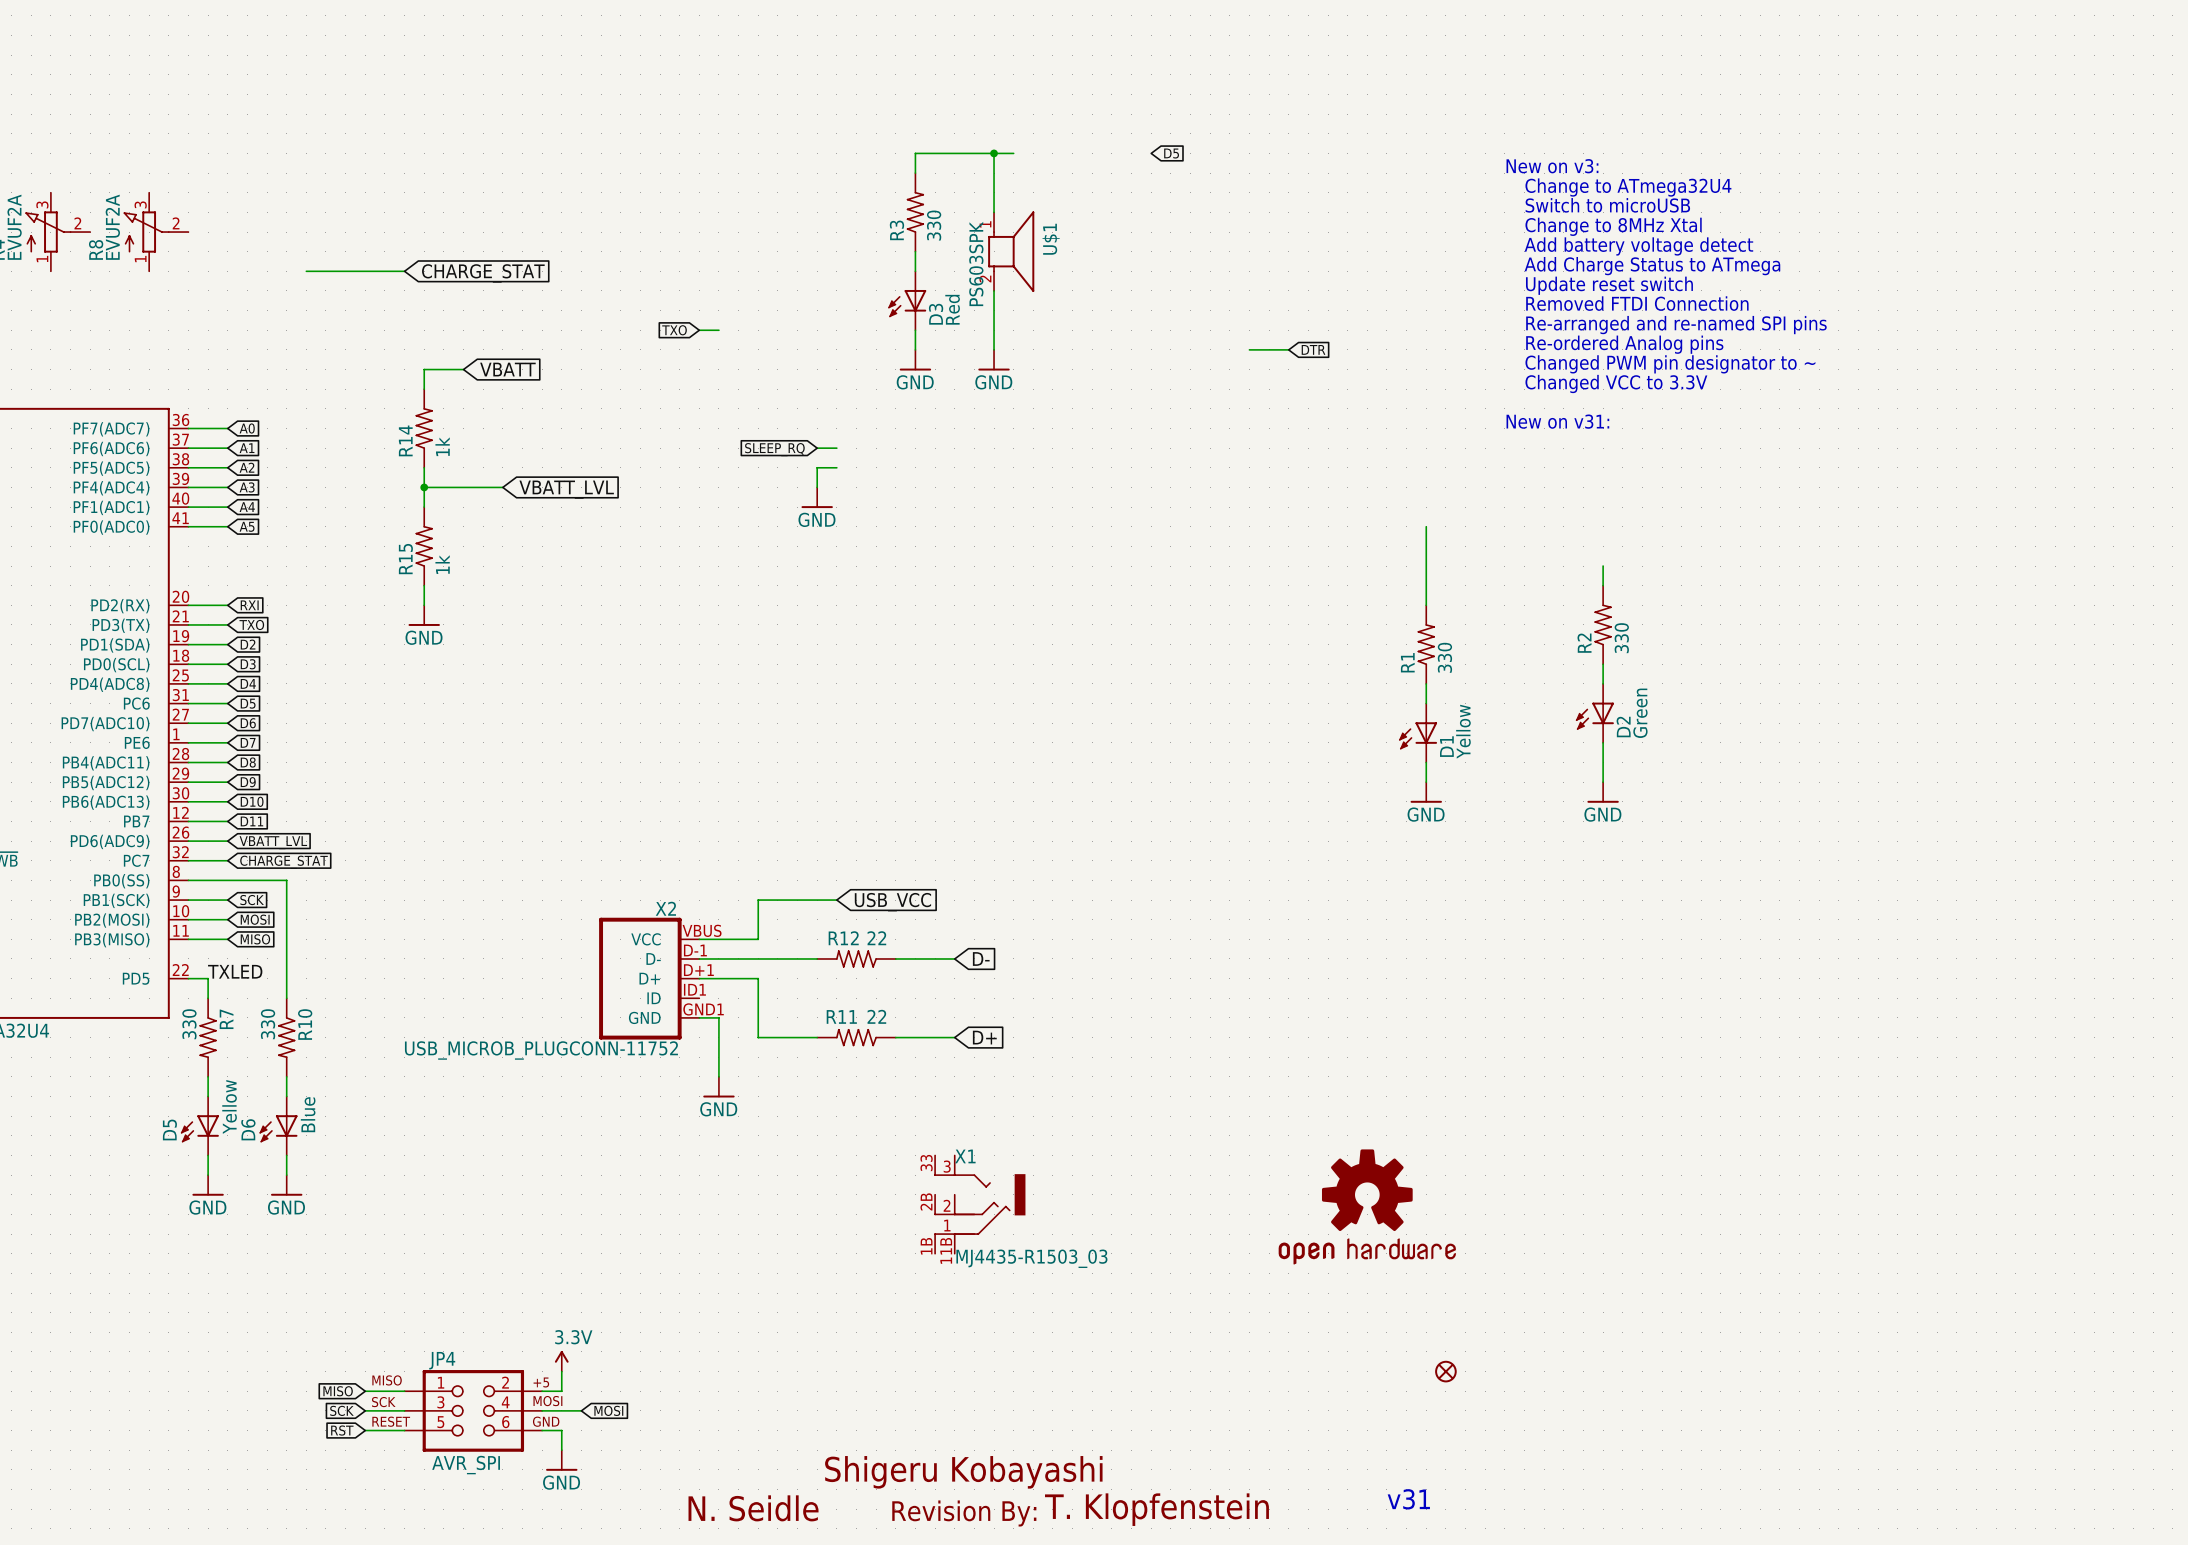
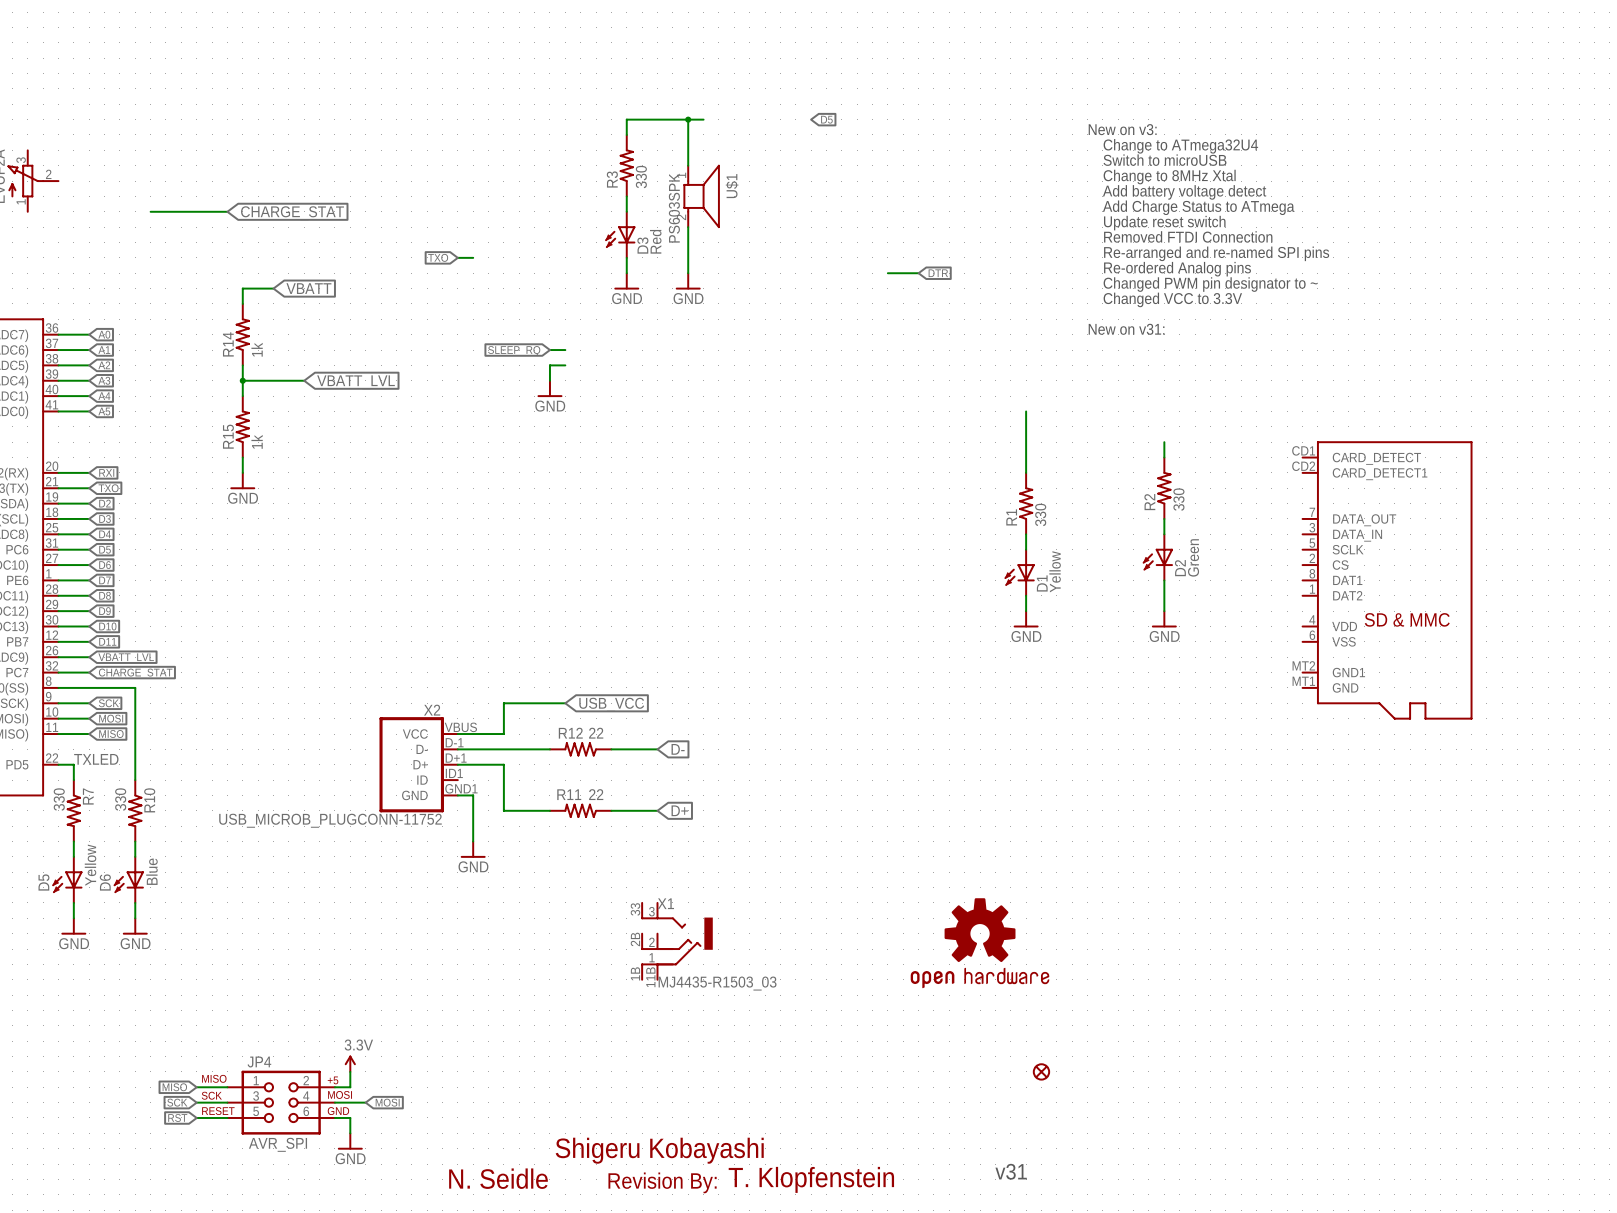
part: none -> (1387, 580)

